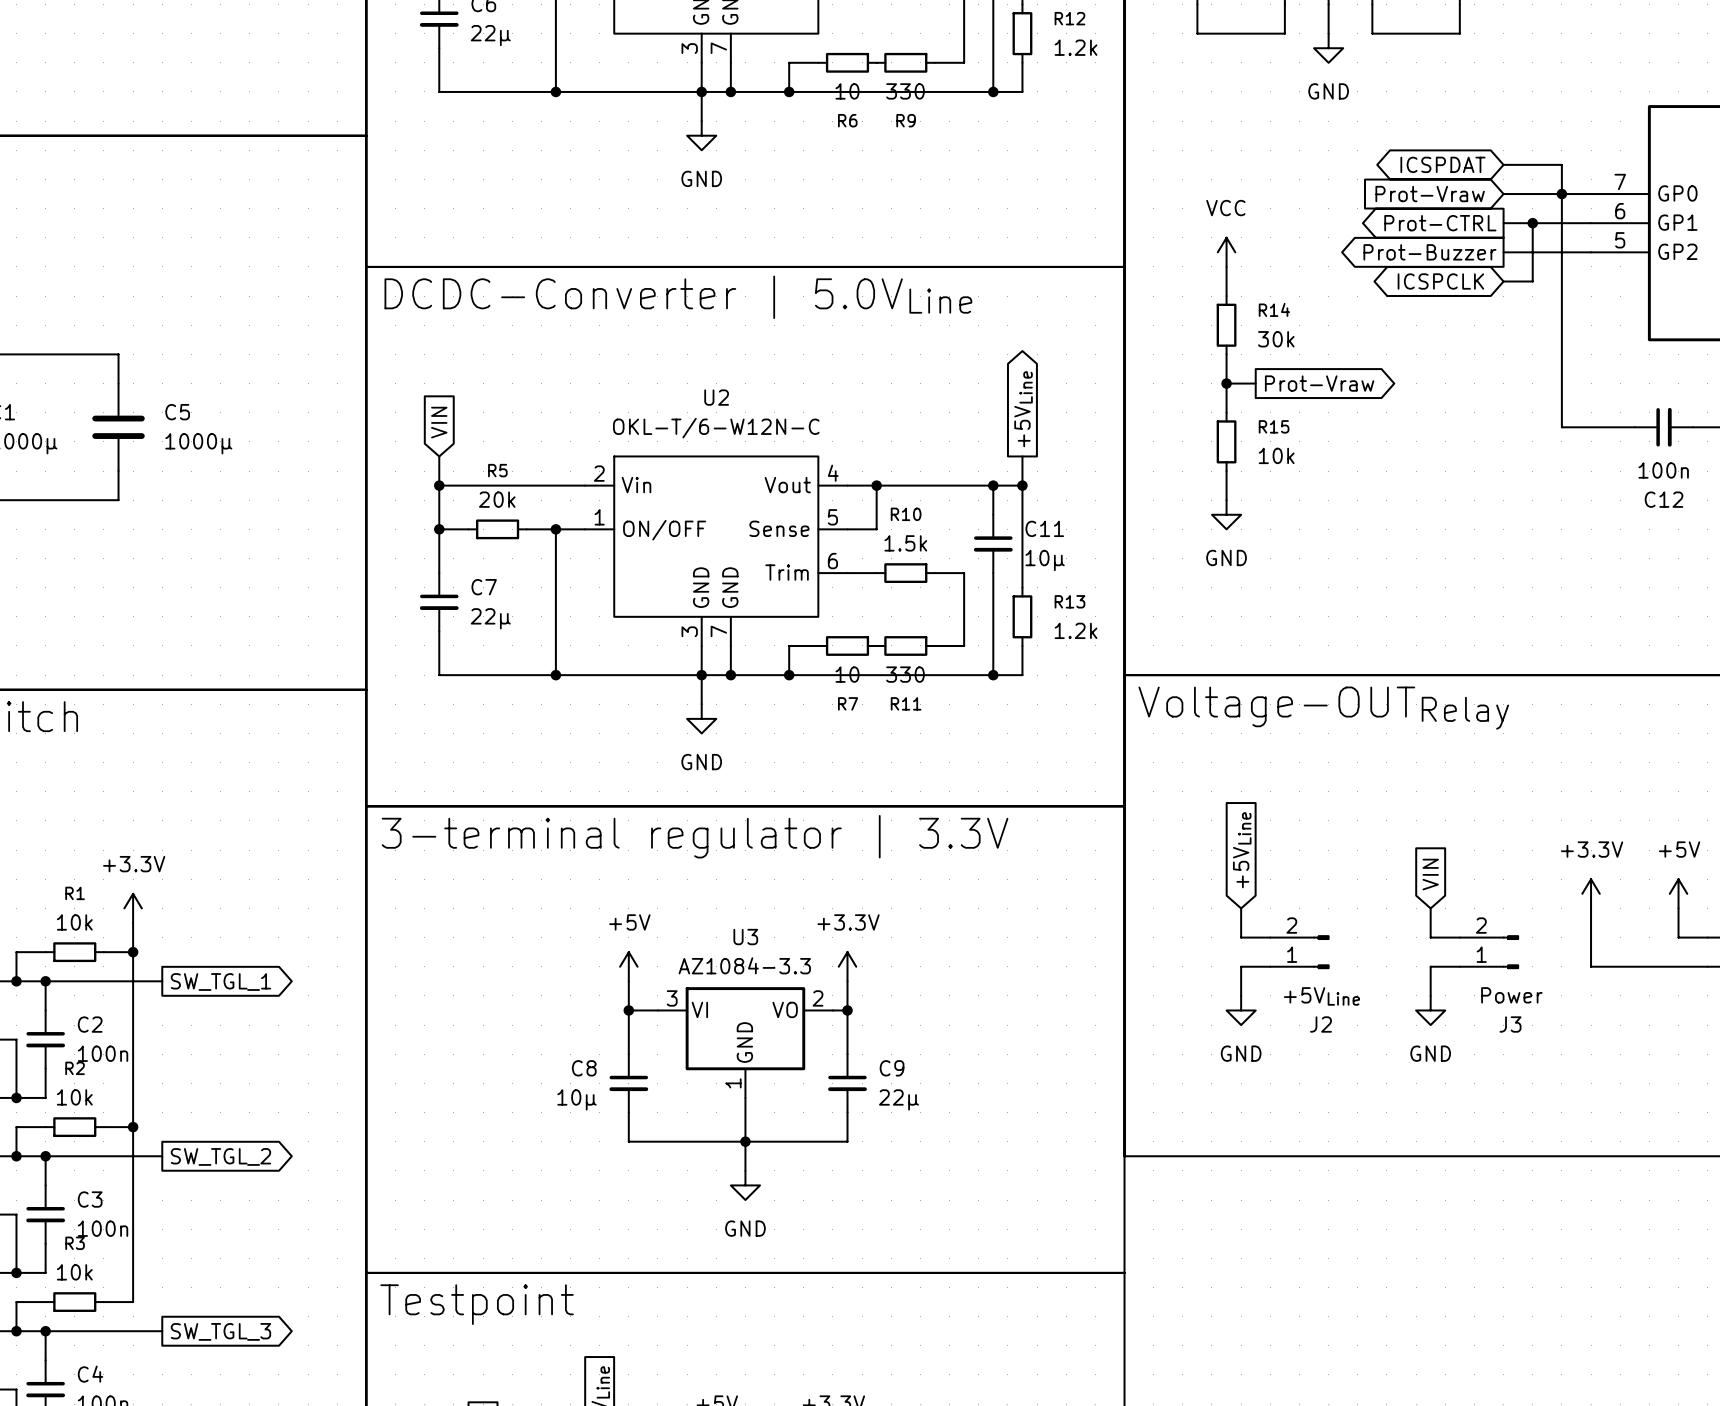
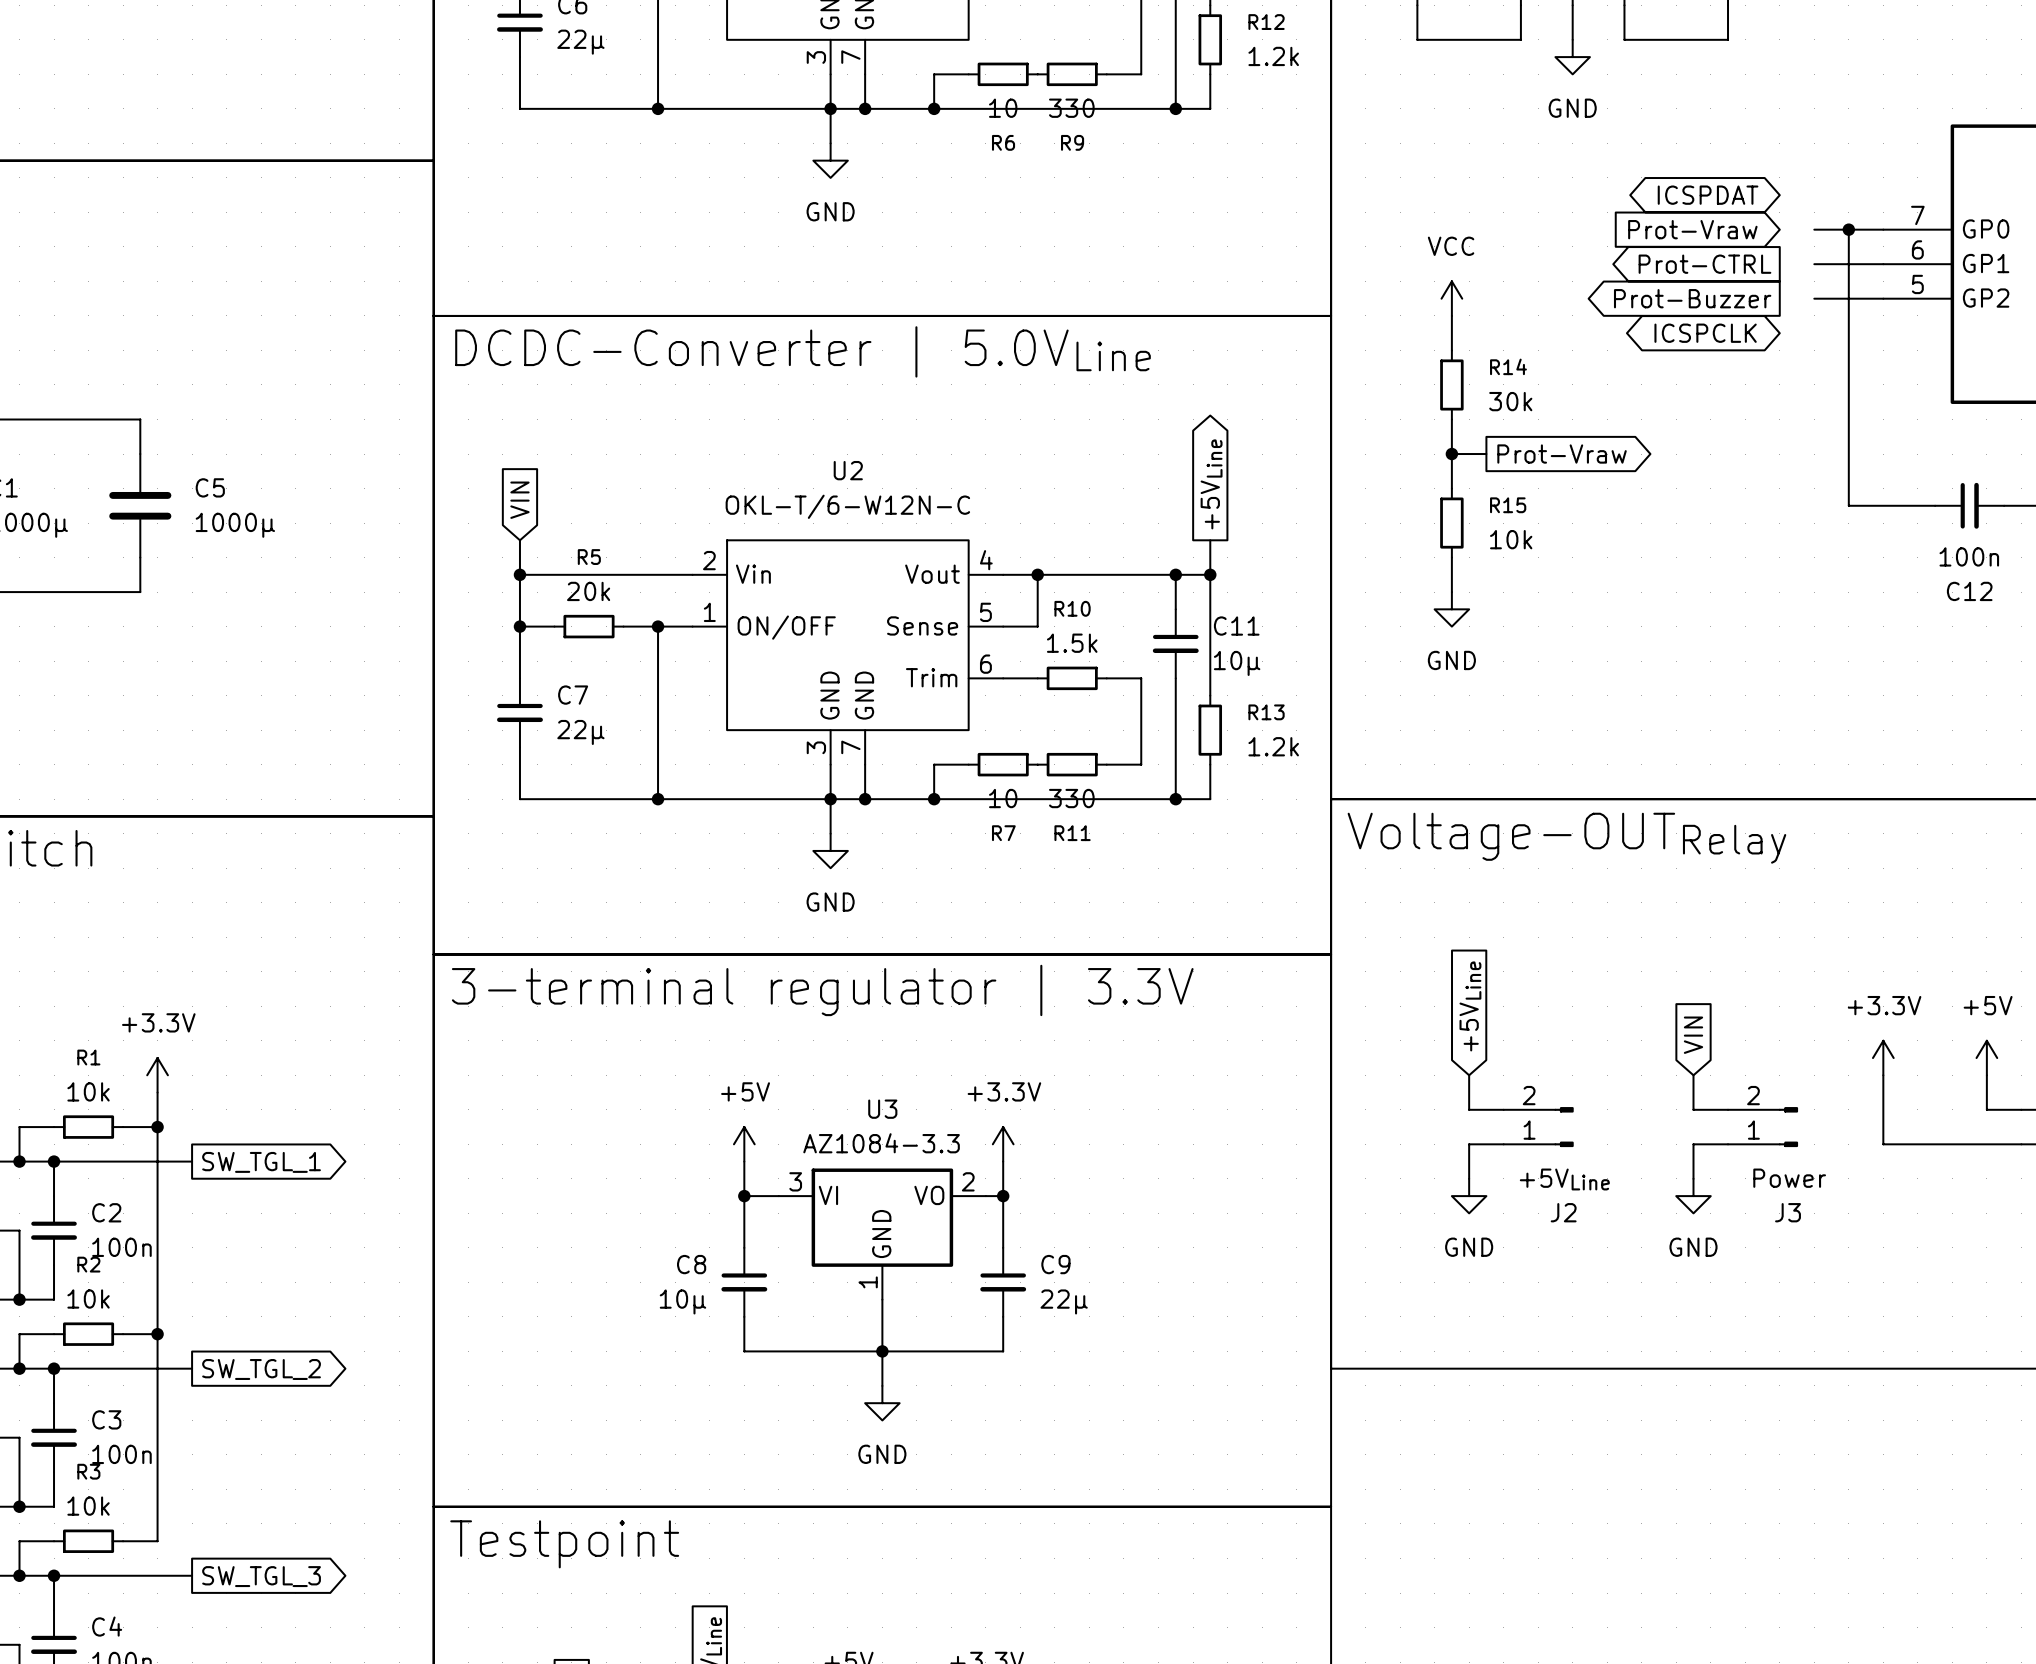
wire: (1503, 164) (1561, 164) (1561, 194) -> none
wire: (1503, 194) (1532, 194) -> none
wire: (1503, 223) (1532, 223) (1532, 281) (1503, 281) -> none
junction: (1532, 223) -> none
wire: (1503, 252) (1532, 252) -> none

